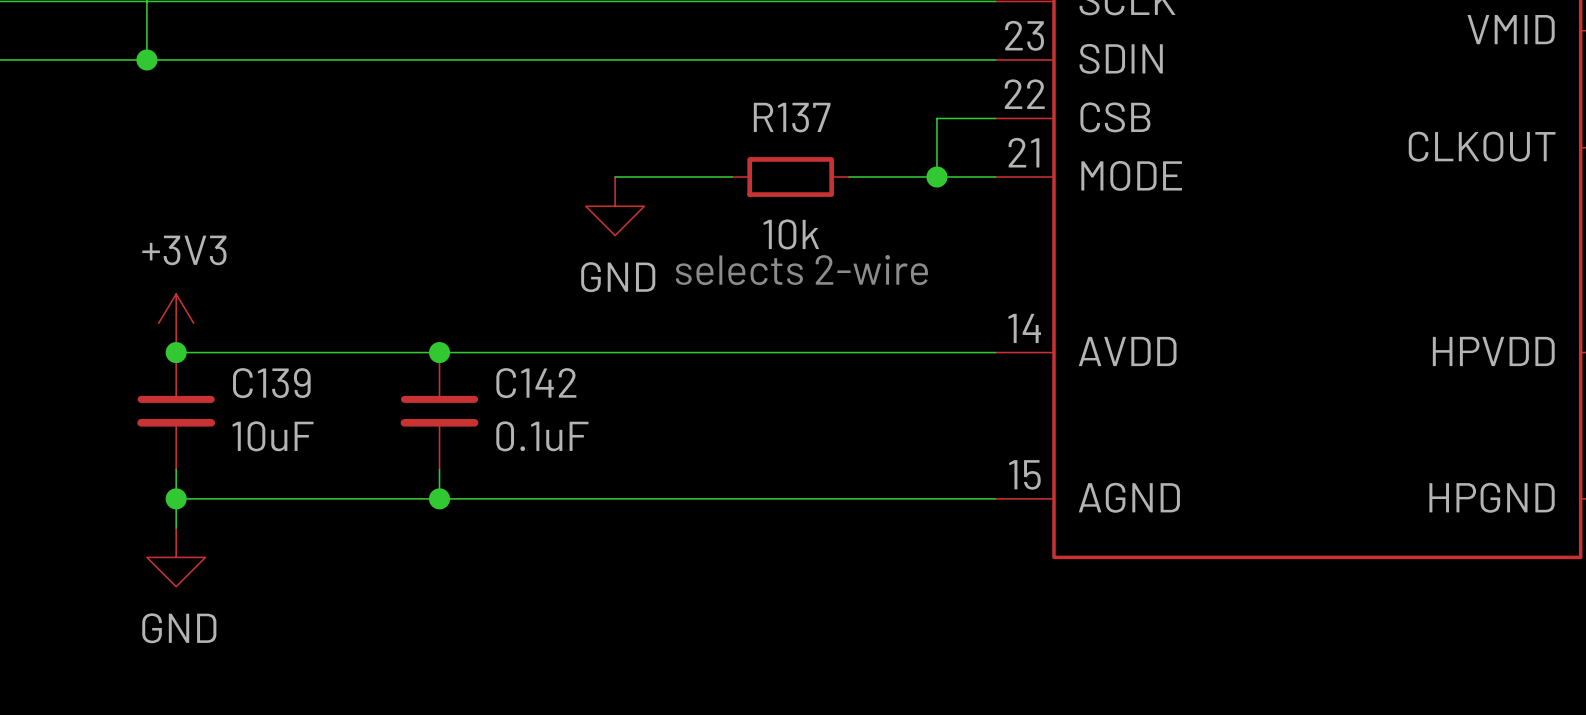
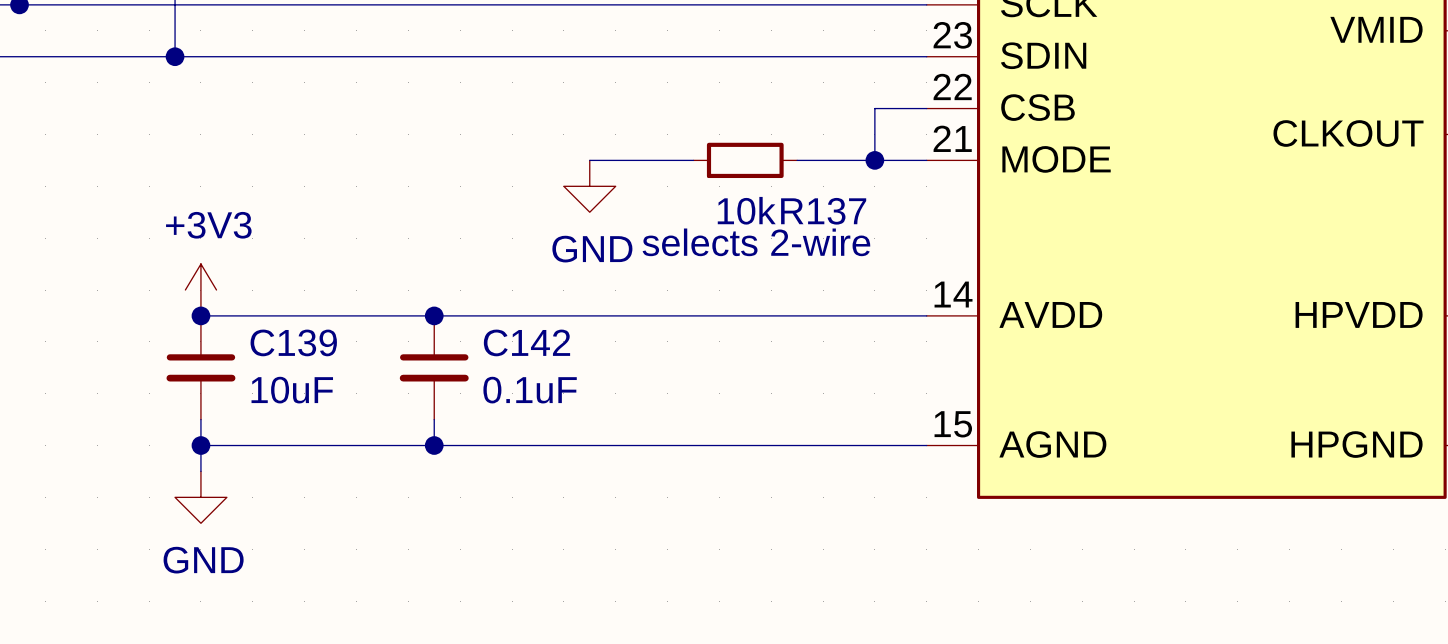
R137 name position: R137 (792, 117) -> R137 (823, 211)

